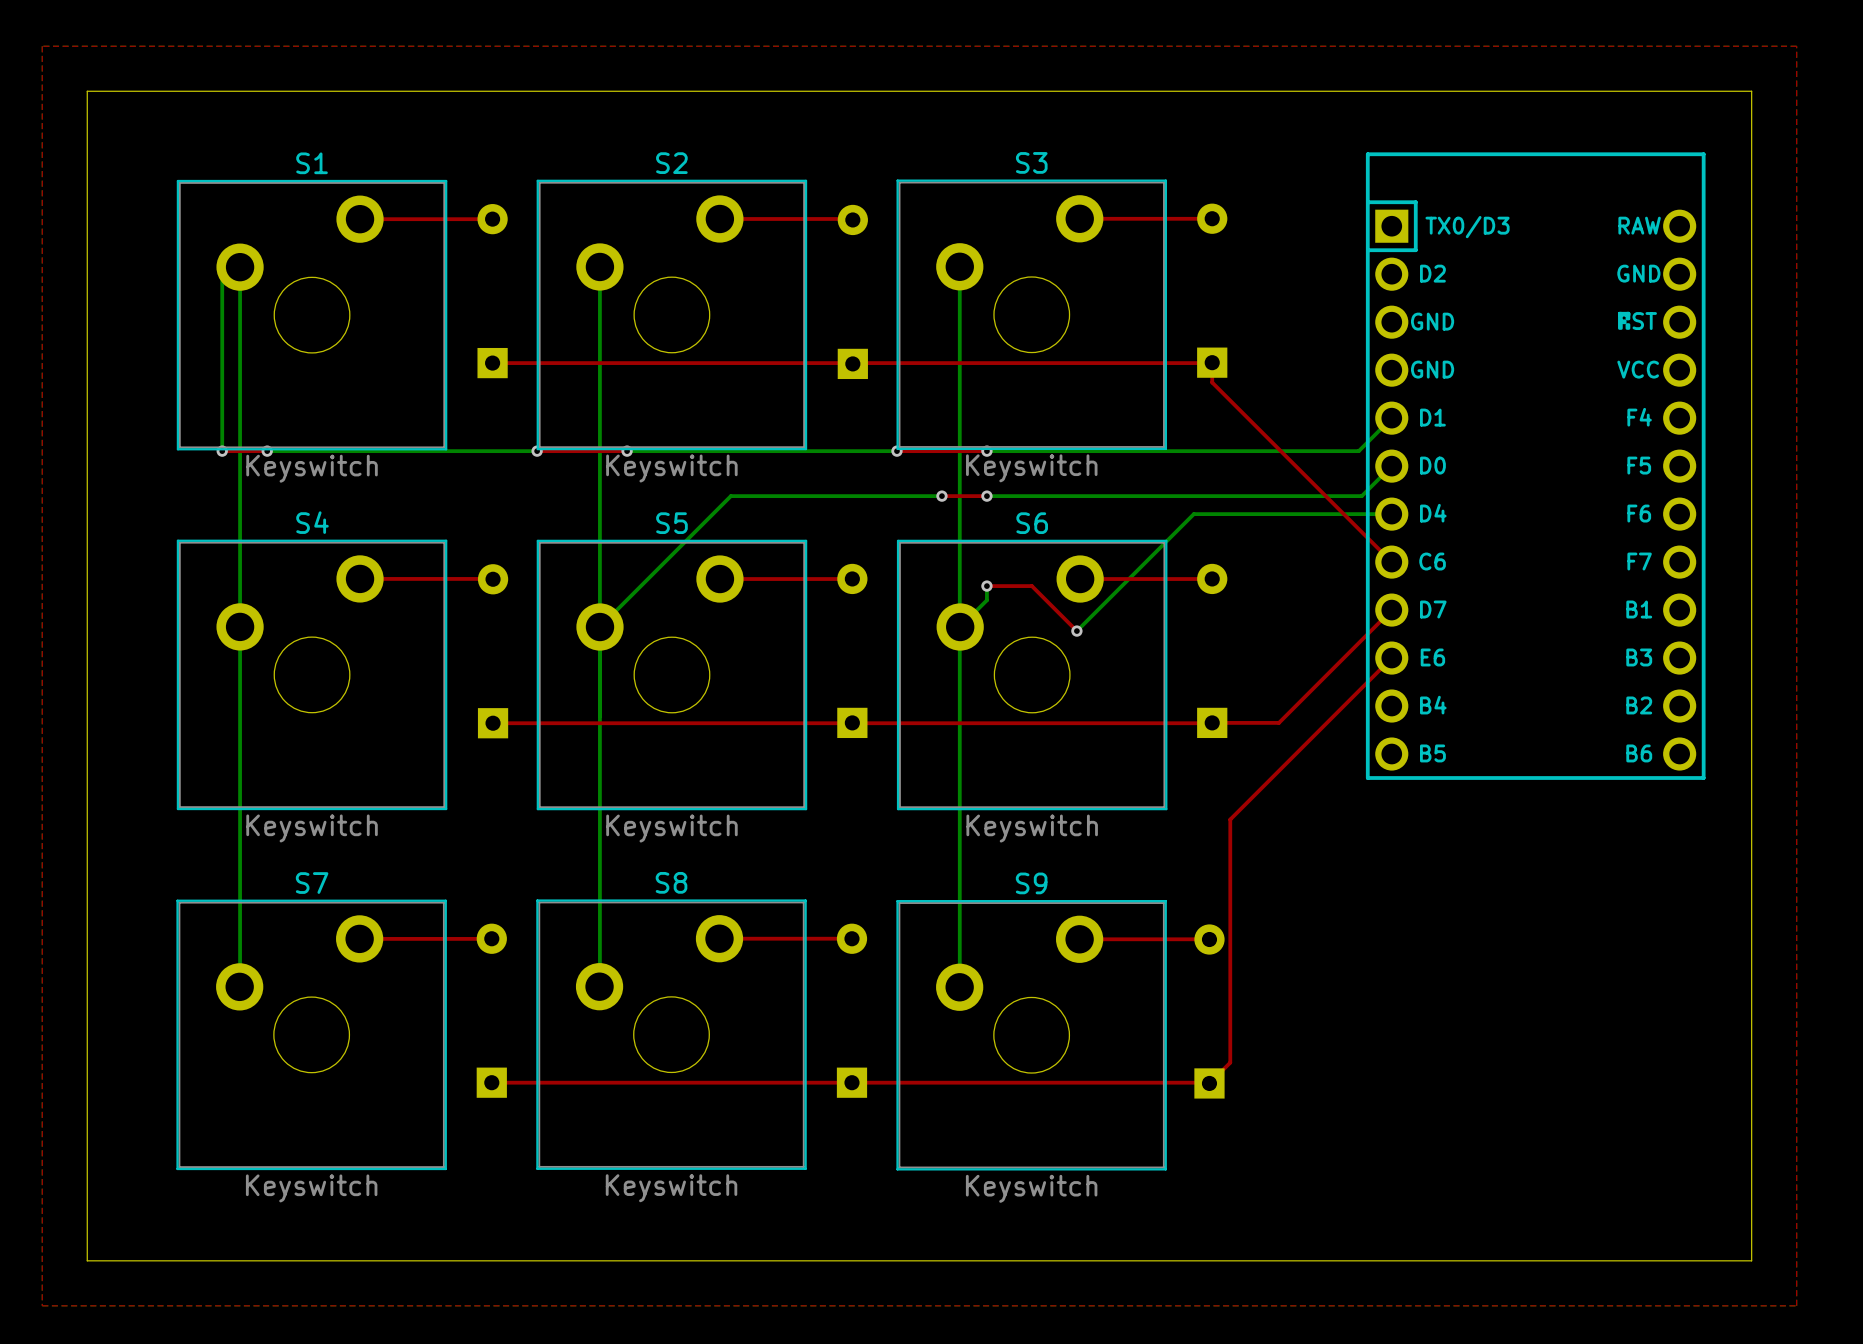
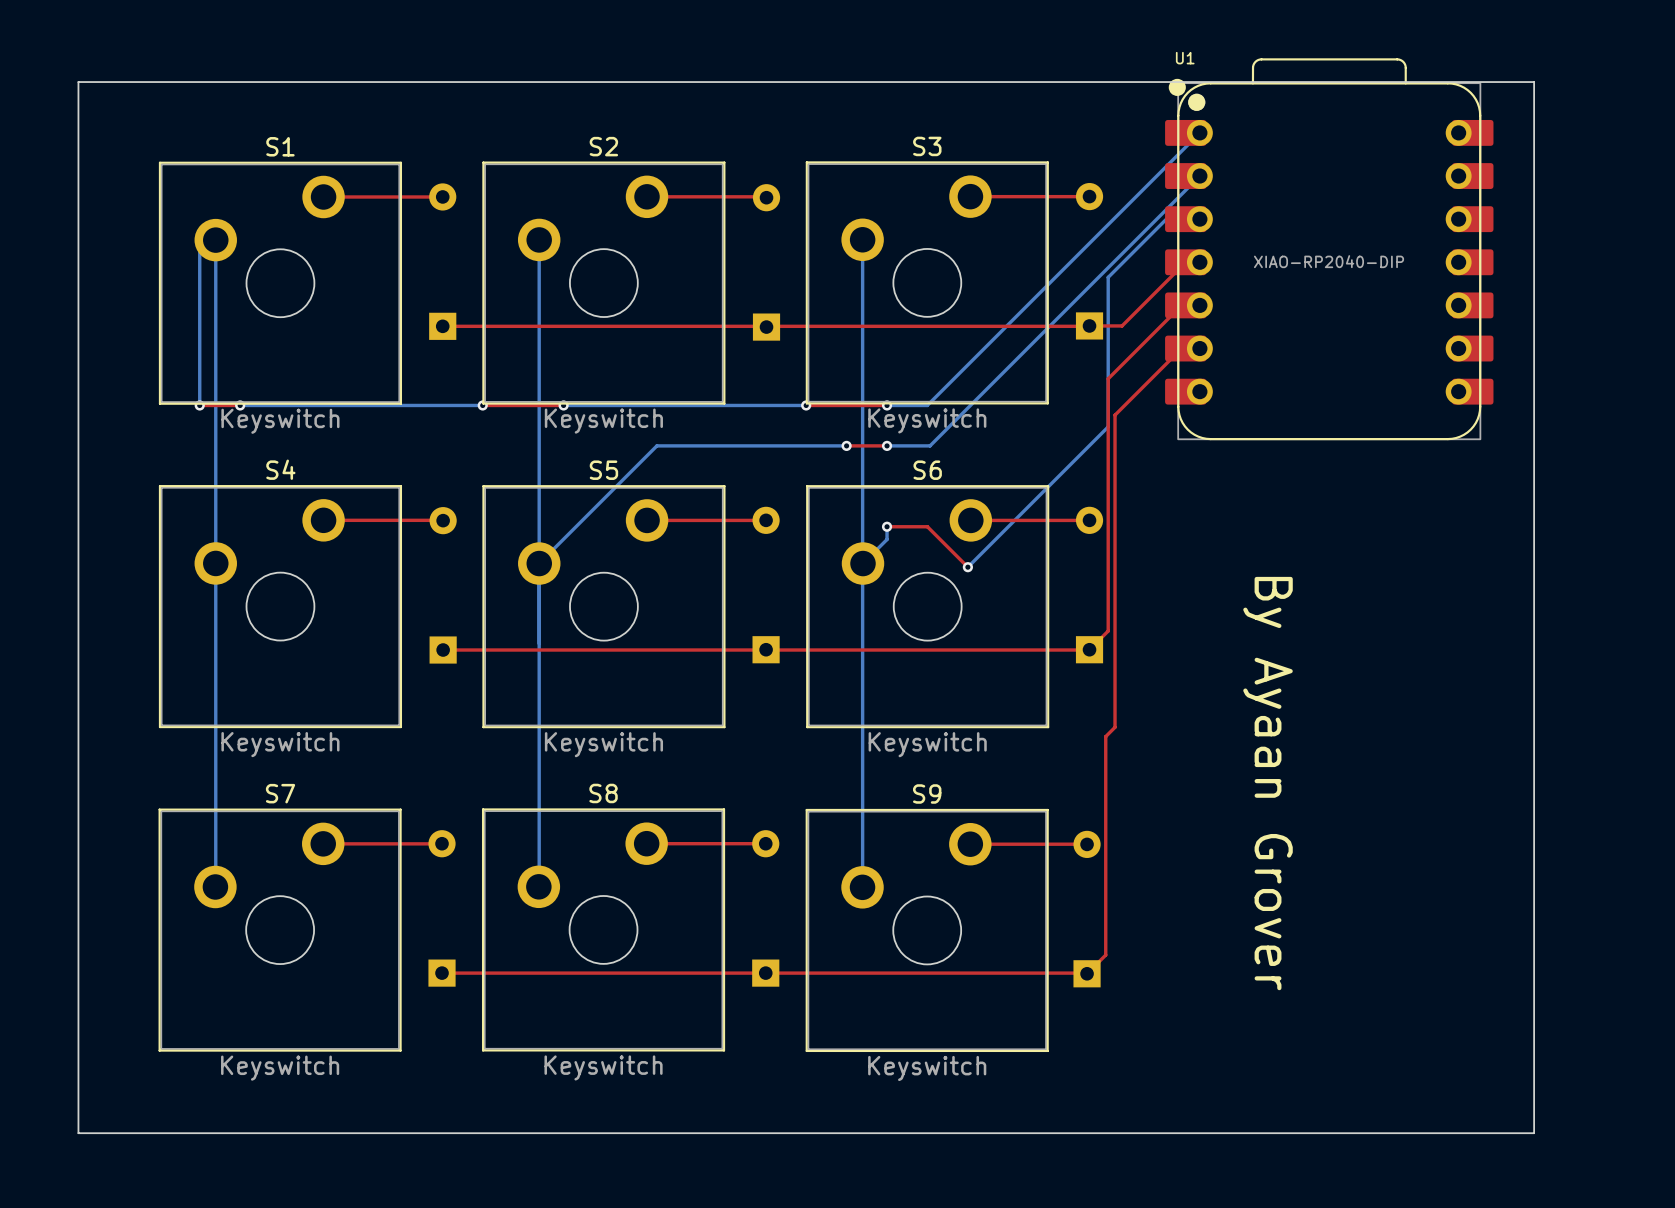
top zone outline: (42, 46) (42, 1305) (1796, 1305) (1796, 46) (42, 46) -> none
board edge: (1706, 91) (1751, 91) (1751, 1260) (1706, 1260) -> (1534, 82) (1534, 1133)
U1: none -> XIAO-RP2040-DIP (1329, 249)
top track: (1212, 362) (1212, 382) (1391, 562) -> (1089, 325) (1122, 325) (1185, 262)
bottom track: (1391, 418) (1358, 451) (1031, 451) -> (1199, 132) (927, 405)
bottom track: (1391, 466) (1361, 496) (1034, 496) -> (1199, 176) (930, 445)
part: (1535, 466) -> none
bottom track: (1193, 514) (1391, 514) -> (1073, 462) (1108, 426) (1108, 277) (1176, 209) (1185, 219) (1199, 219)
top track: (1391, 610) (1278, 722) (1212, 722) -> (1199, 305) (1181, 305) (1108, 378) (1108, 631) (1089, 649)
top track: (1391, 658) (1240, 809) -> (1199, 348) (1181, 348) (1115, 415) (1115, 727)
text: none -> By Ayaan Grover (1268, 783)

